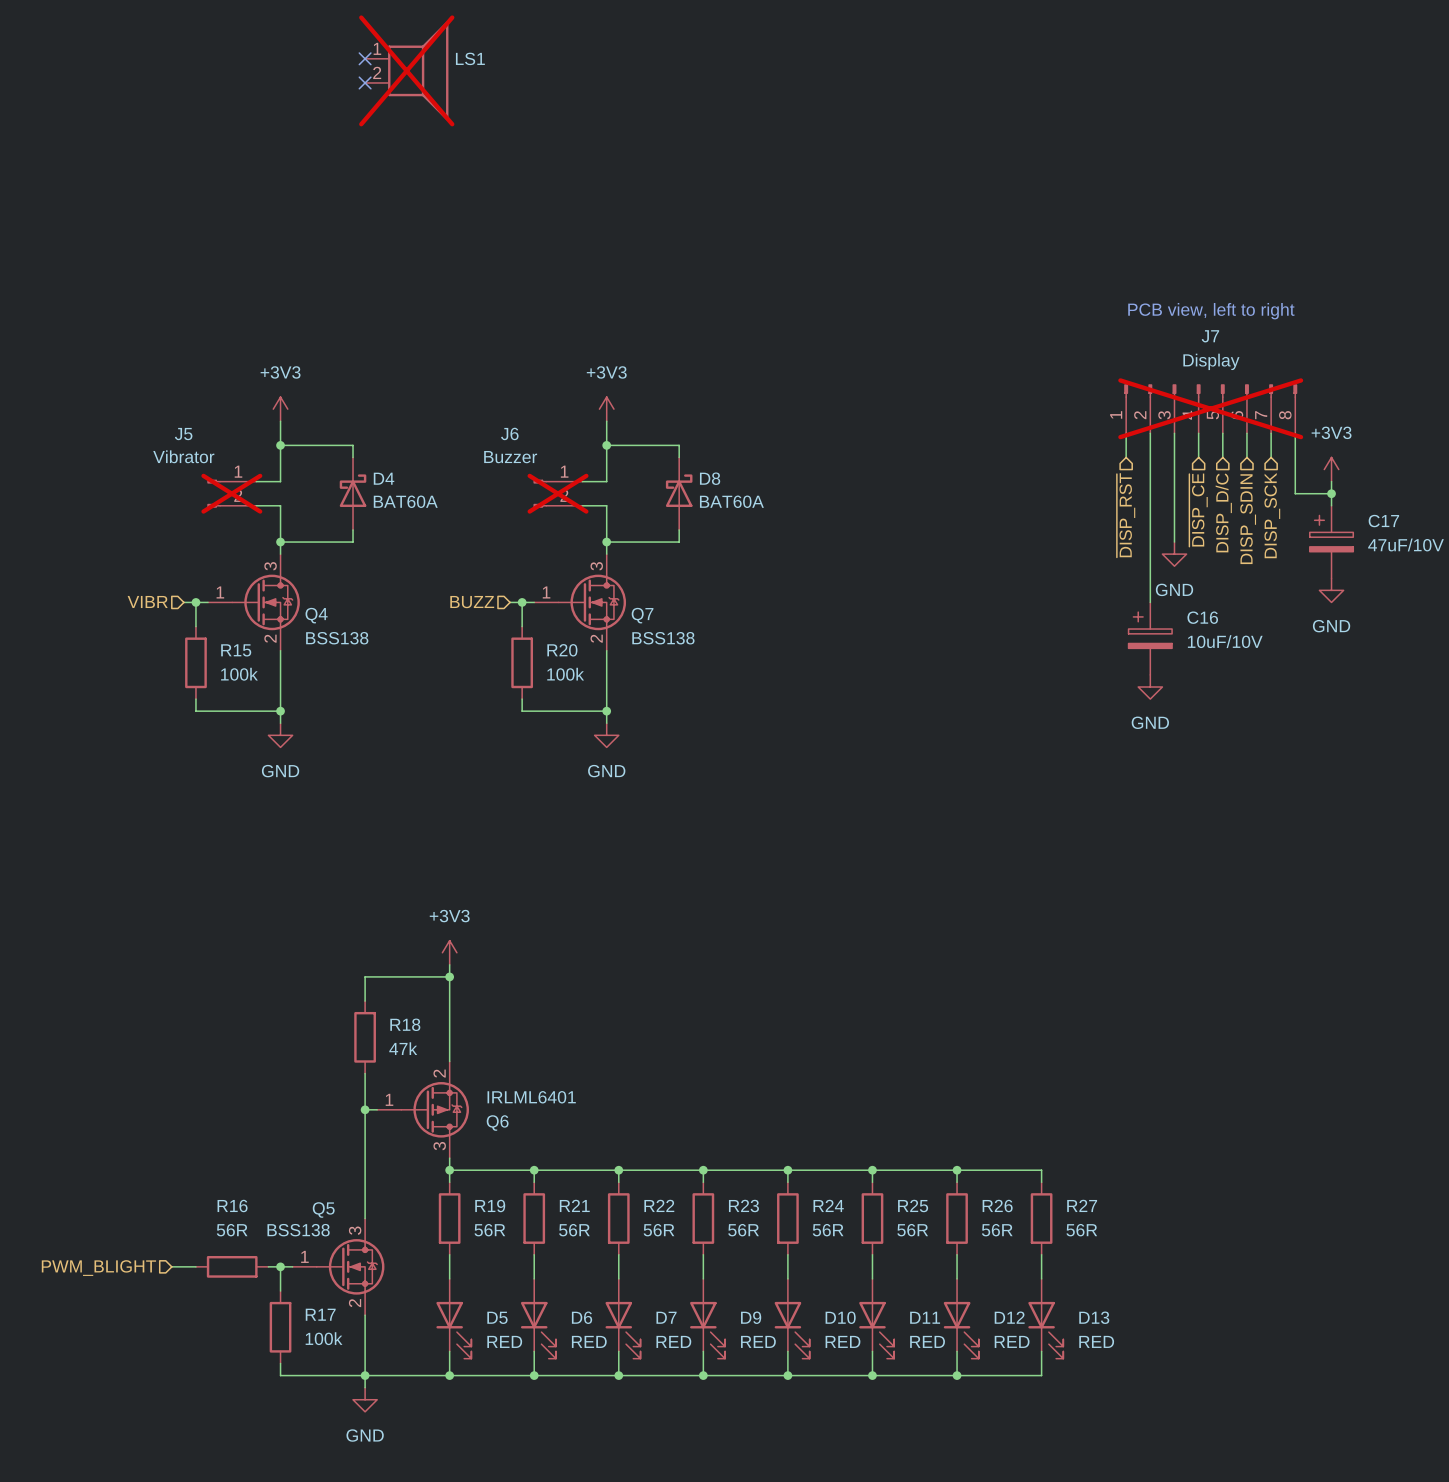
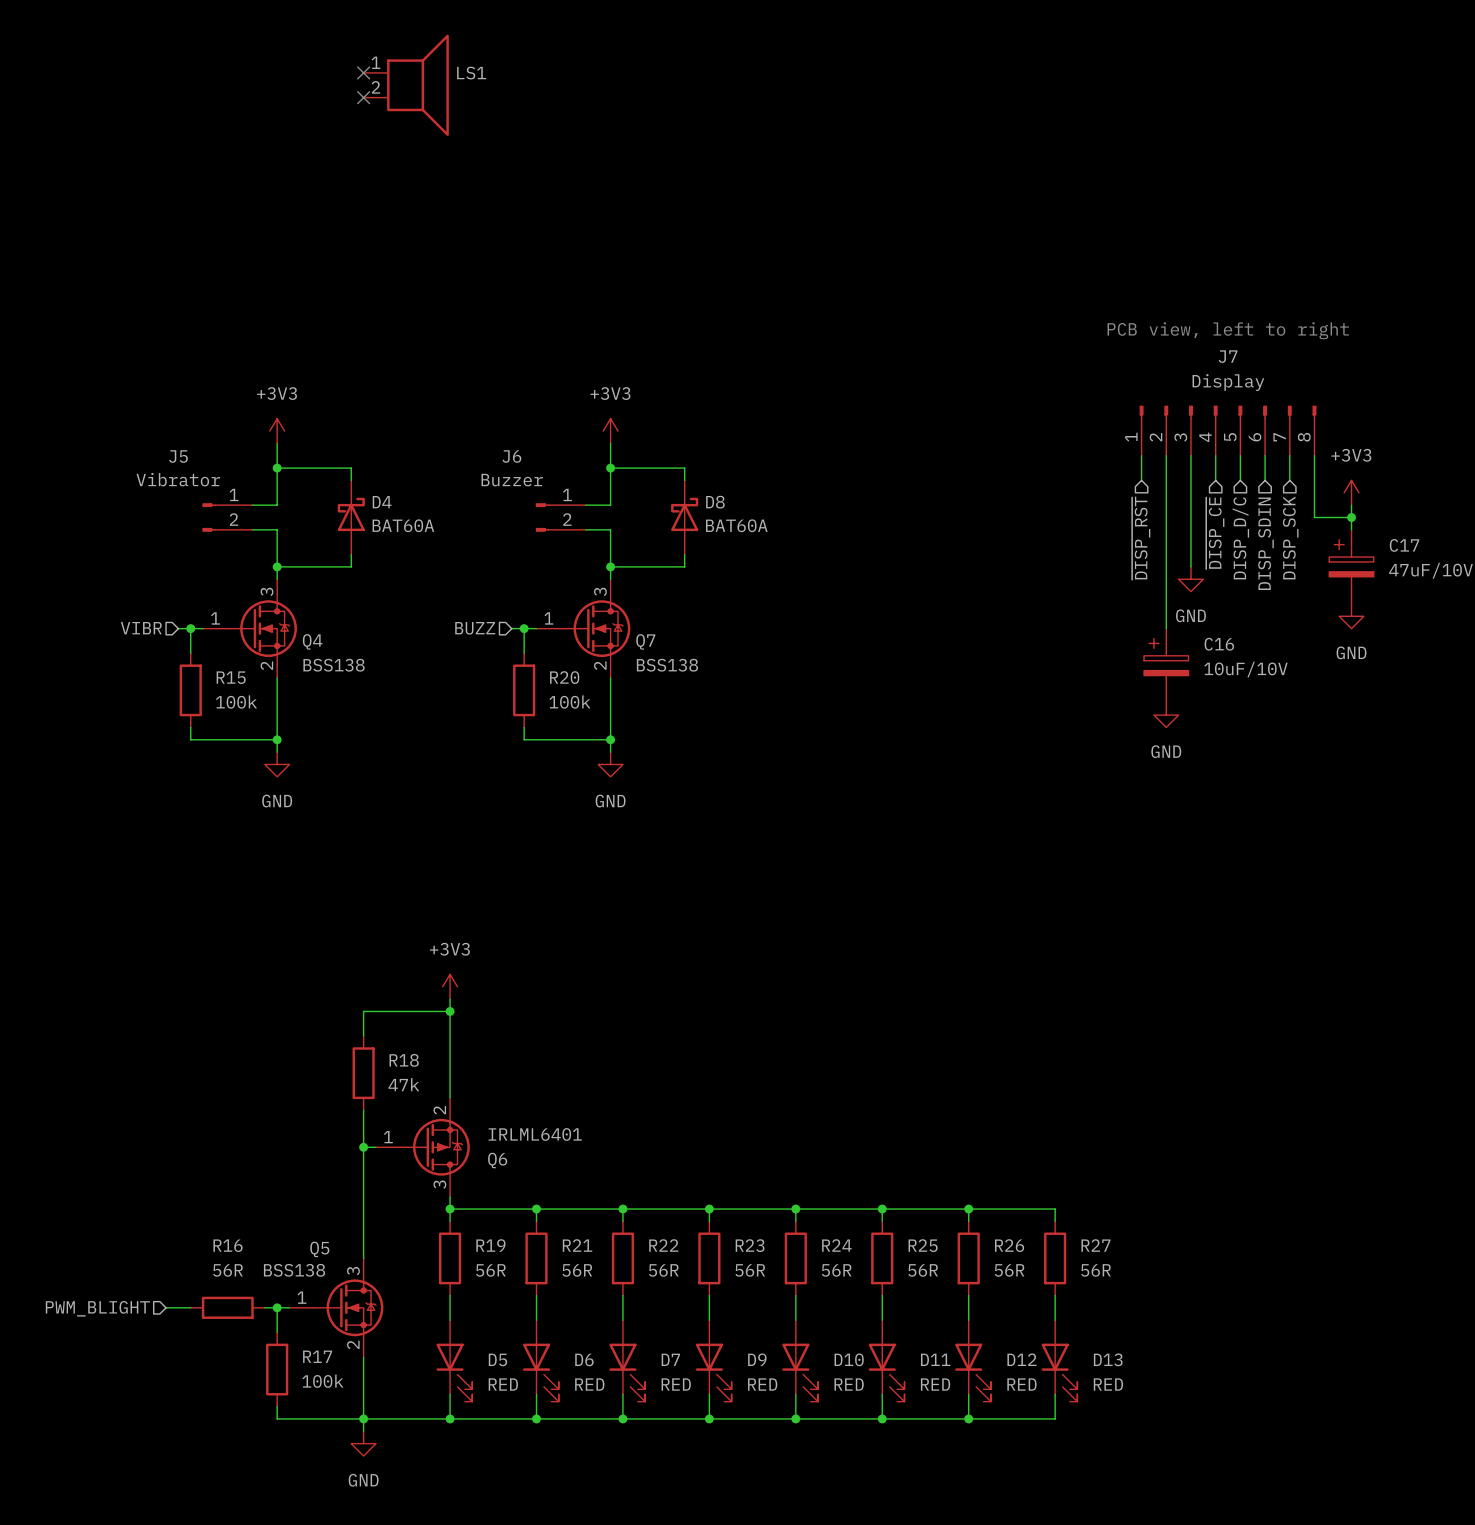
LS1 do-not-place cross: (406, 70) -> none
J7 do-not-place cross: (1210, 408) -> none
J5 do-not-place cross: (231, 493) -> none
J6 do-not-place cross: (558, 493) -> none

